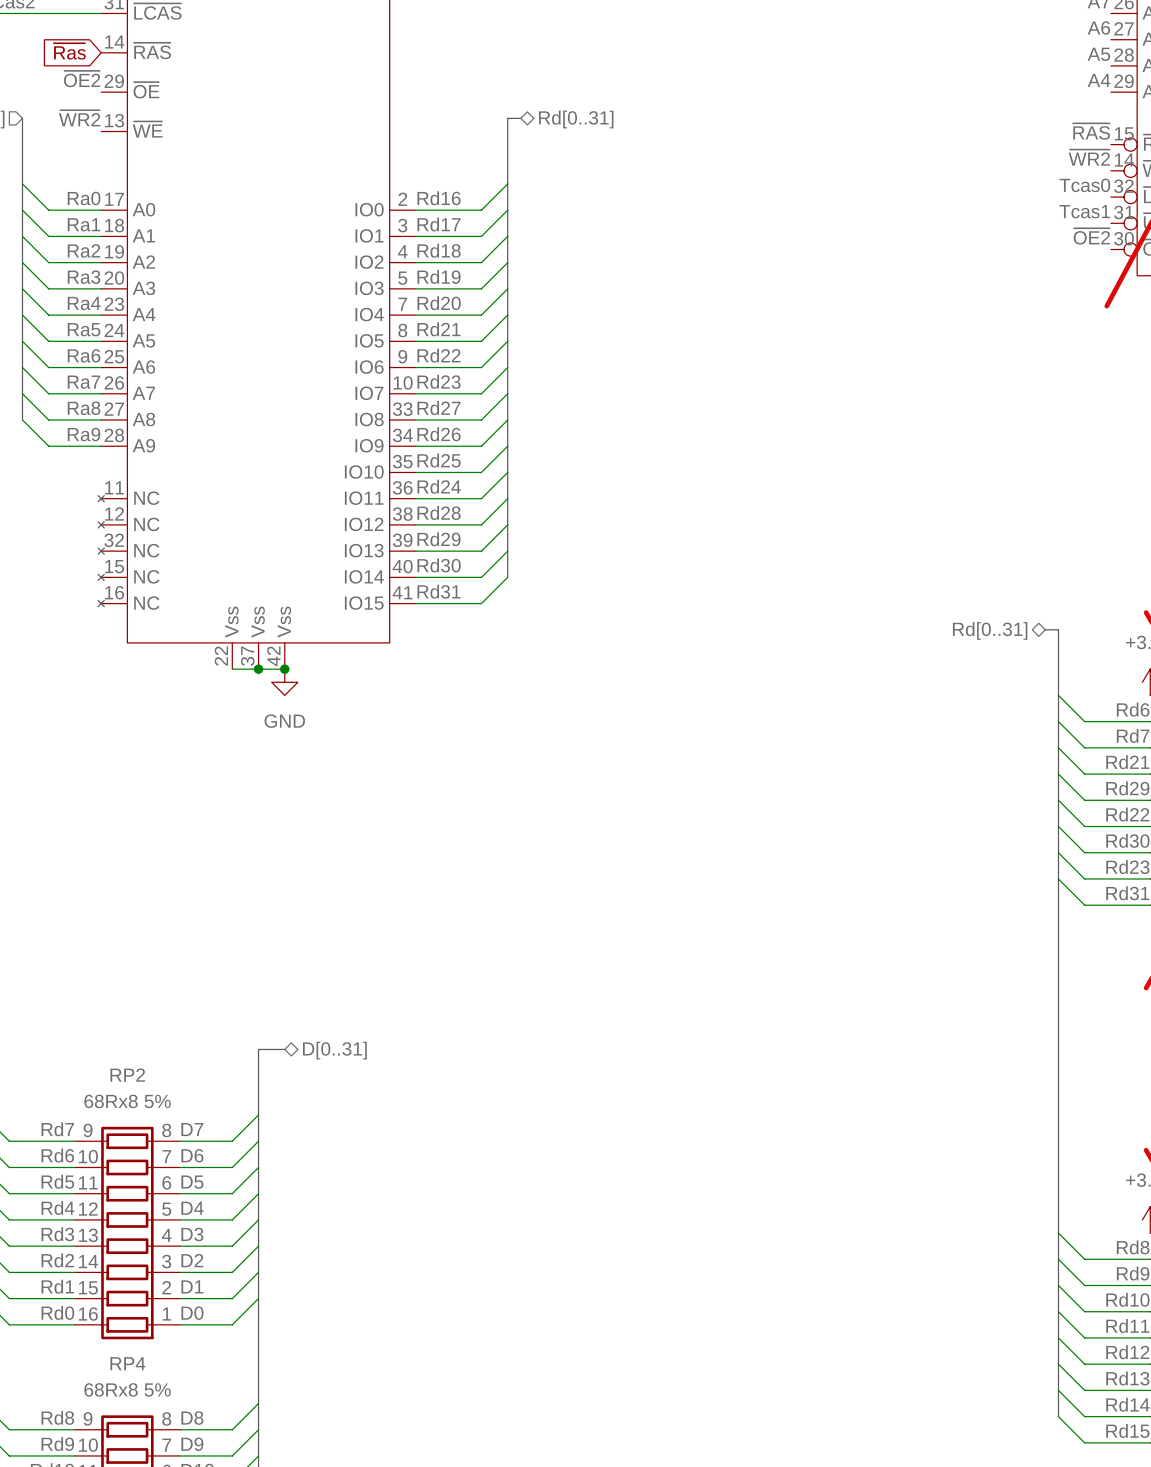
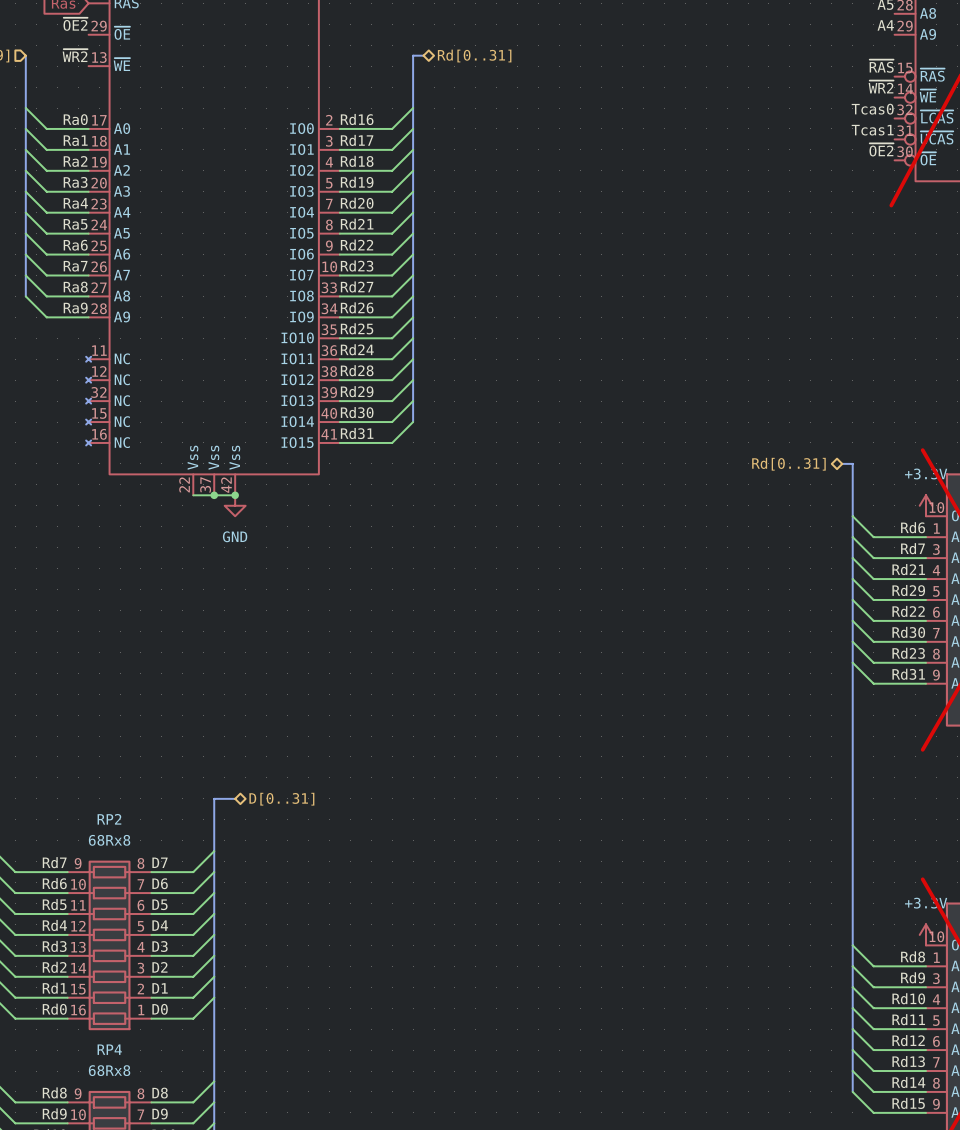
RP2 value: 68Rx8 5% (127, 1101) -> 68Rx8 (109, 840)
RP4 value: 68Rx8 5% (127, 1389) -> 68Rx8 (109, 1070)

